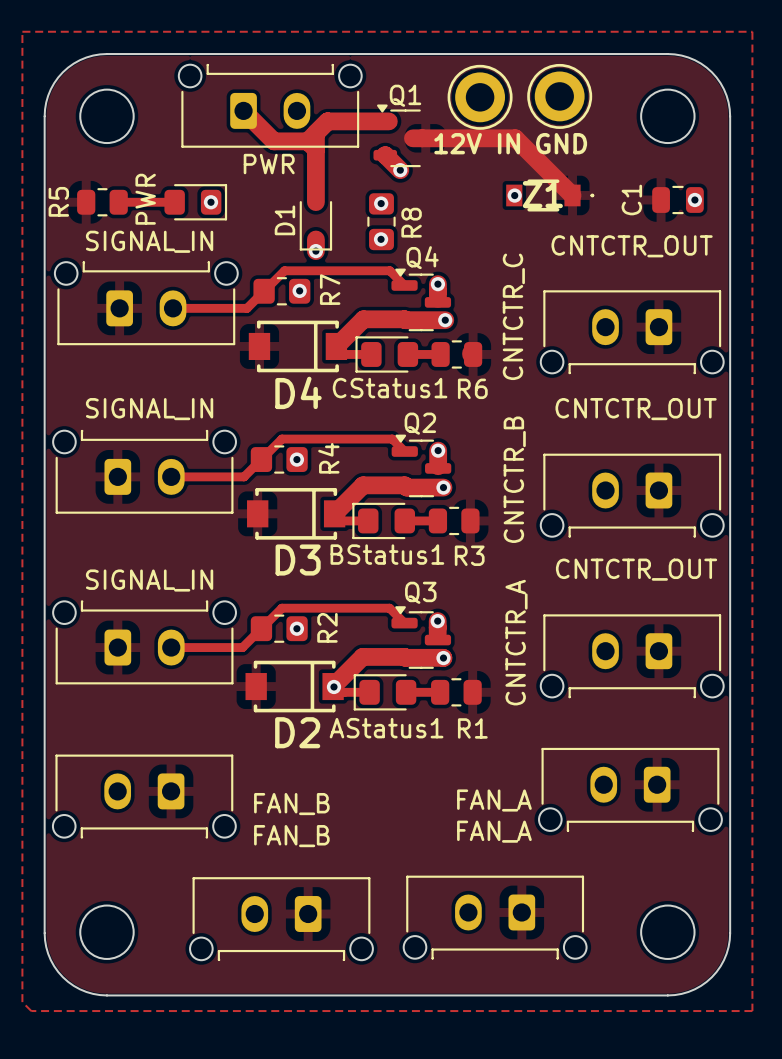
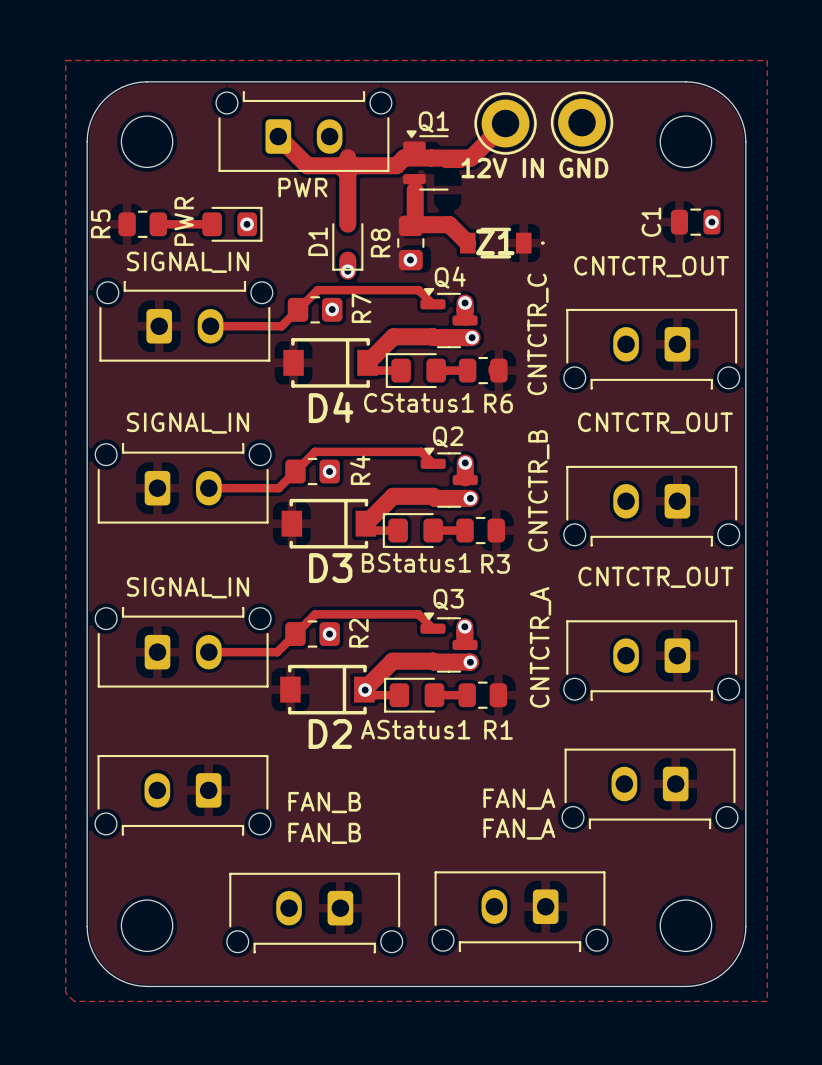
track: (388, 121) (327, 121) (307, 141) -> (505, 123) (471, 158) (404, 158) (396, 165) (339, 165)
track: (412, 138) (515, 138) (572, 195) -> none
track: (385, 155) (400, 170) -> none
track: none -> (415, 190) (415, 224) (449, 224) (467, 243)
via: (400, 170) -> none
via: (514, 195) -> none
Z1 position: (550, 195) -> (502, 243)
via: (381, 203) -> none
R8 name position: R8 (411, 222) -> R8 (380, 243)

